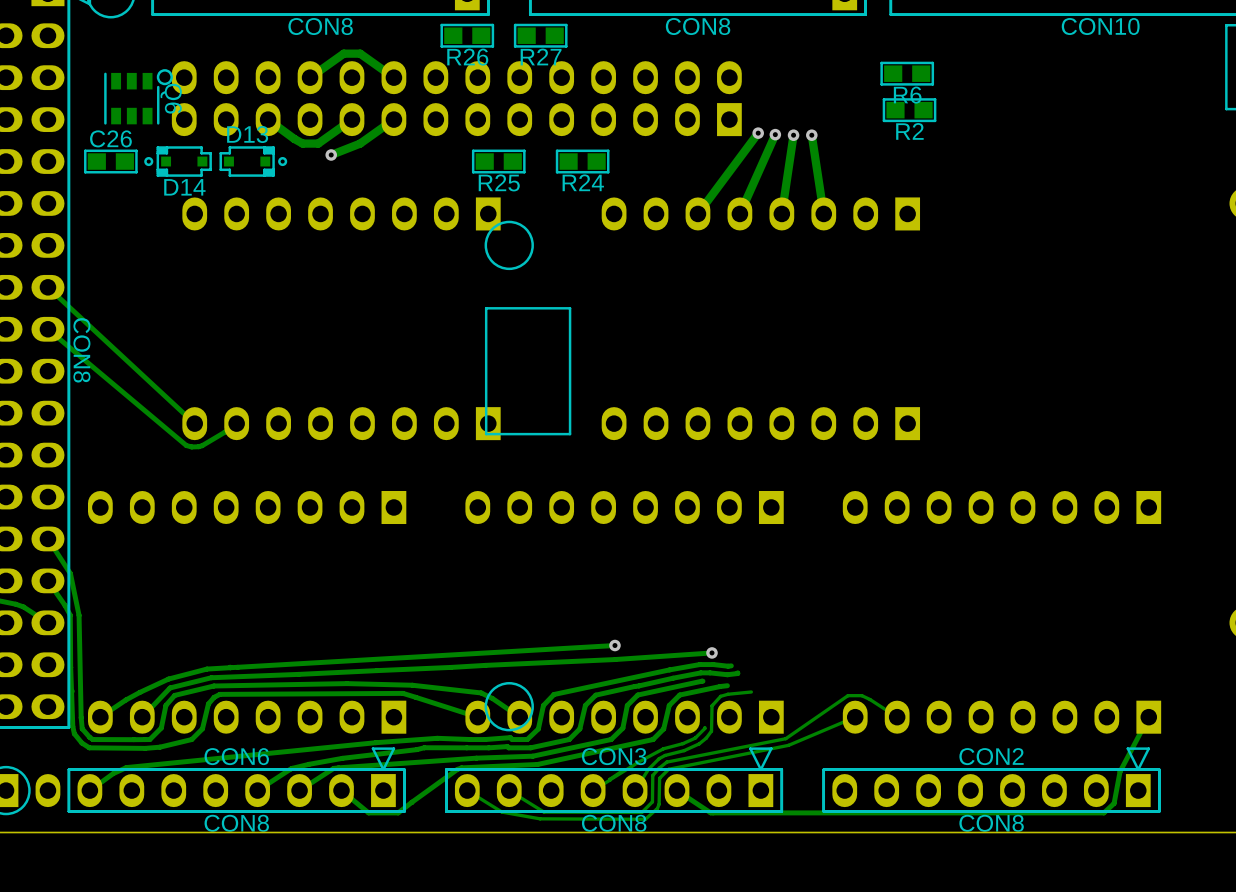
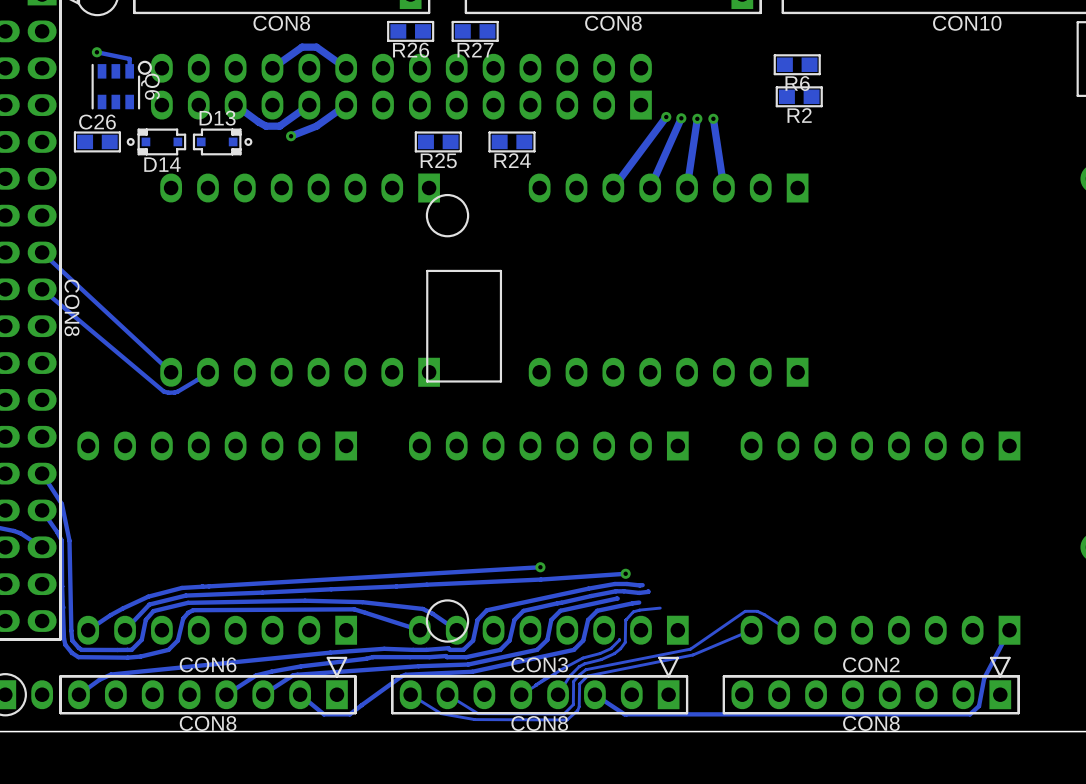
track: none -> (96, 52) (129, 58) (129, 71)
via: none -> (96, 52)

